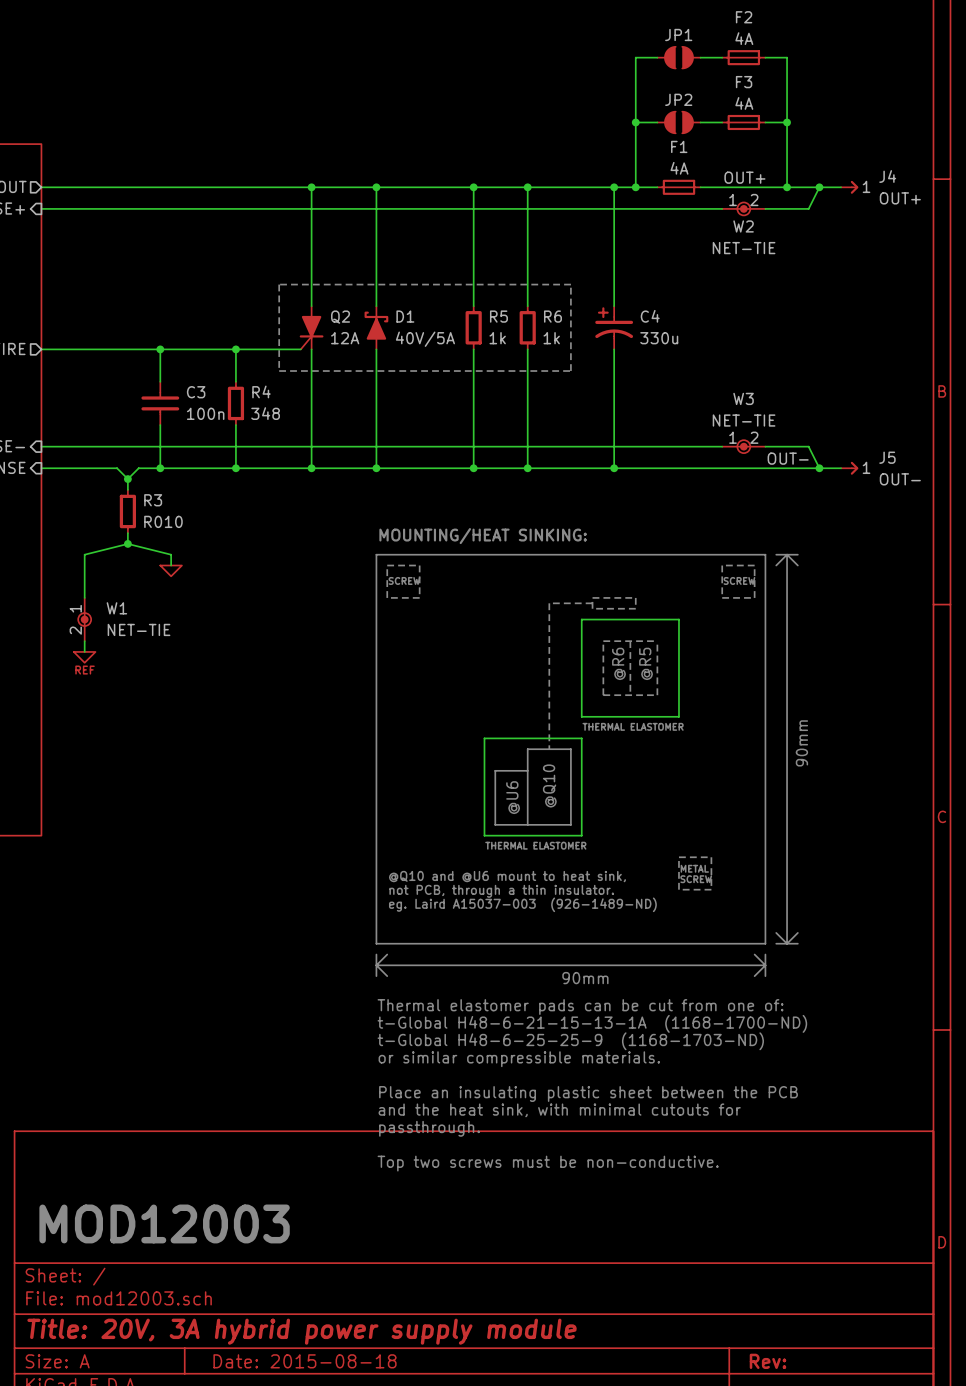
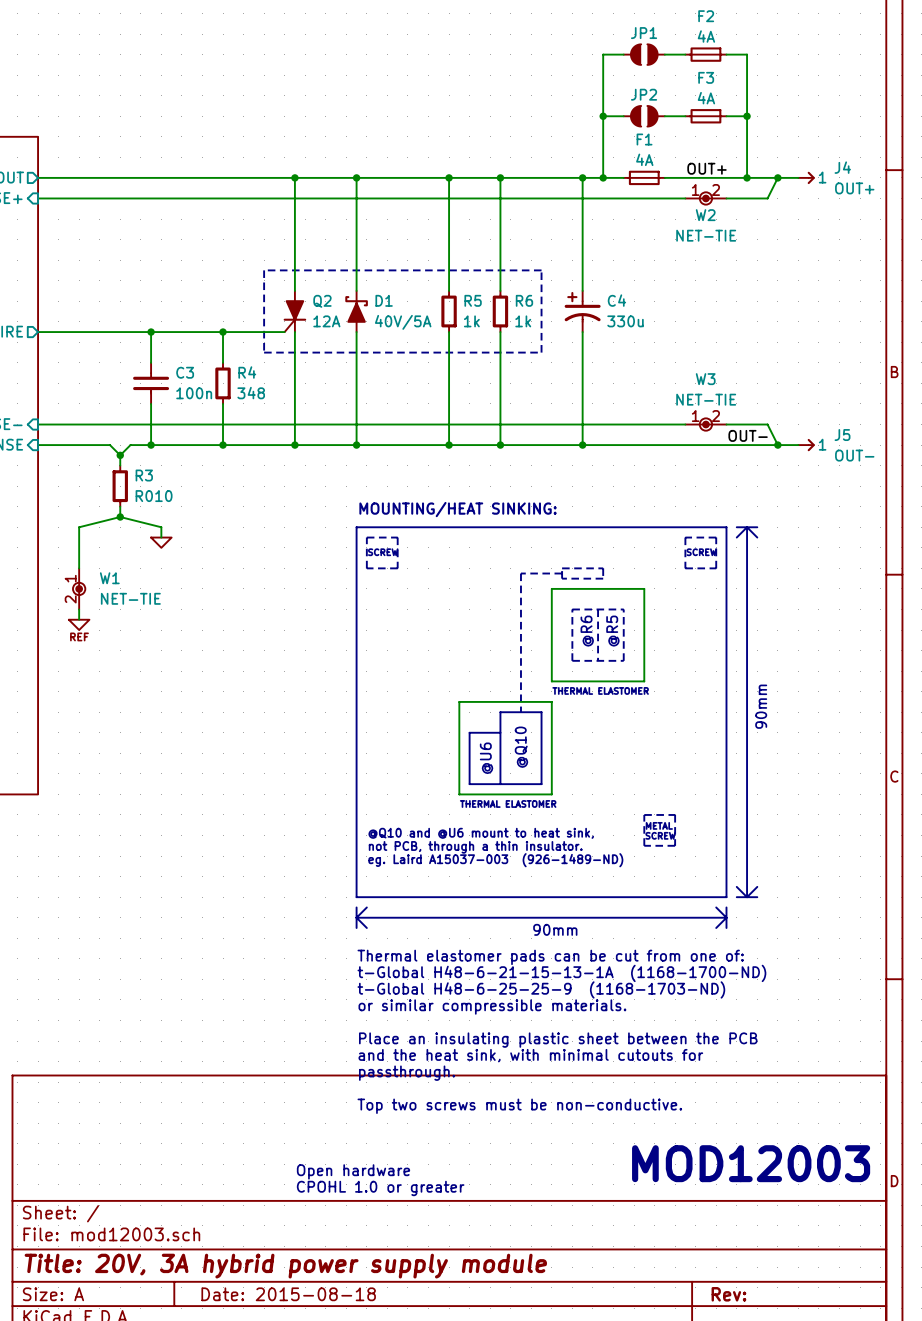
text: MOD12003 (164, 1223) -> none
text: none -> MOD12003 (751, 1163)
text: none -> Open hardware (353, 1171)
text: none -> CPOHL 1.0 or greater (380, 1188)

